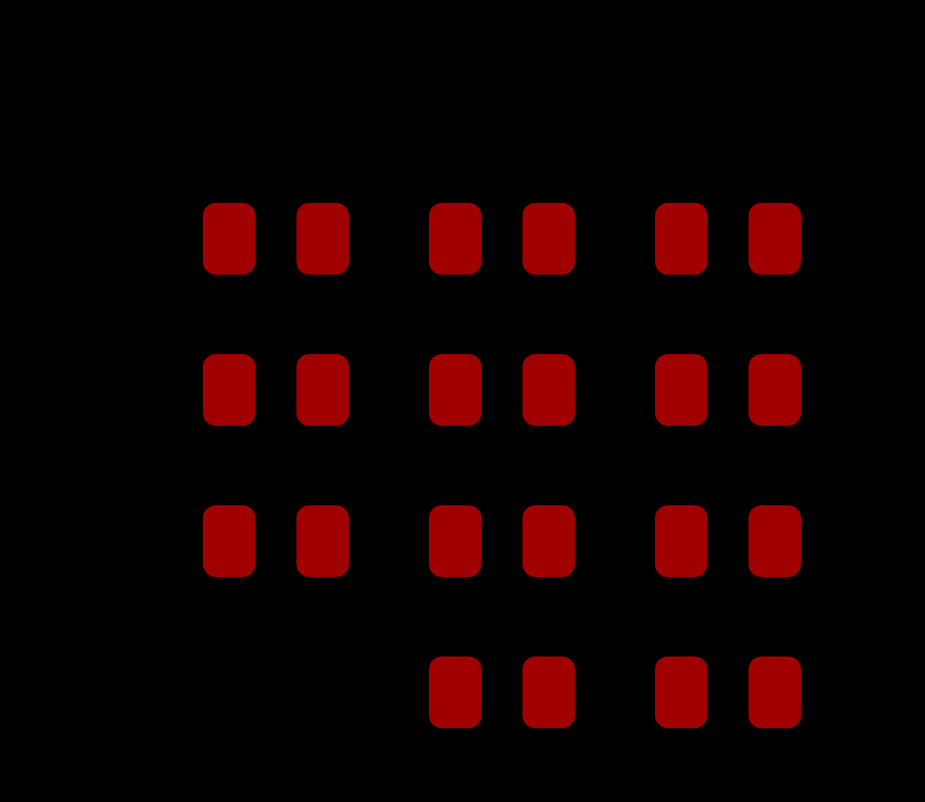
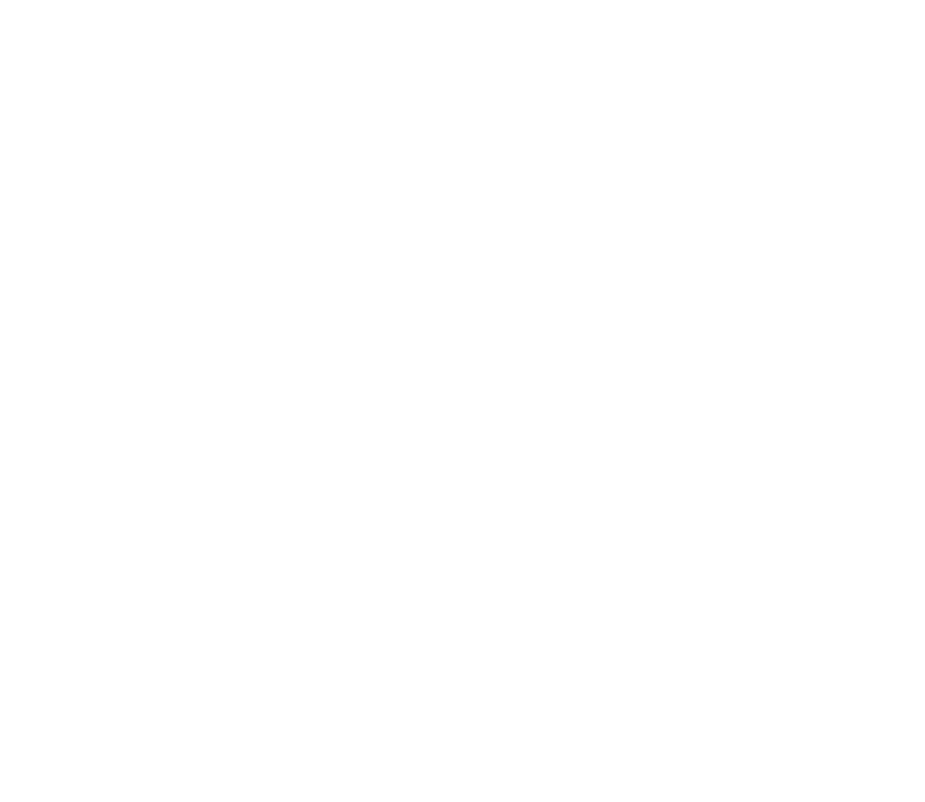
part: (275, 238) -> none
part: (501, 238) -> none
part: (727, 238) -> none
part: (275, 389) -> none
part: (501, 389) -> none
part: (727, 389) -> none
part: (275, 541) -> none
part: (501, 541) -> none
part: (727, 541) -> none
part: (501, 692) -> none
part: (727, 692) -> none

